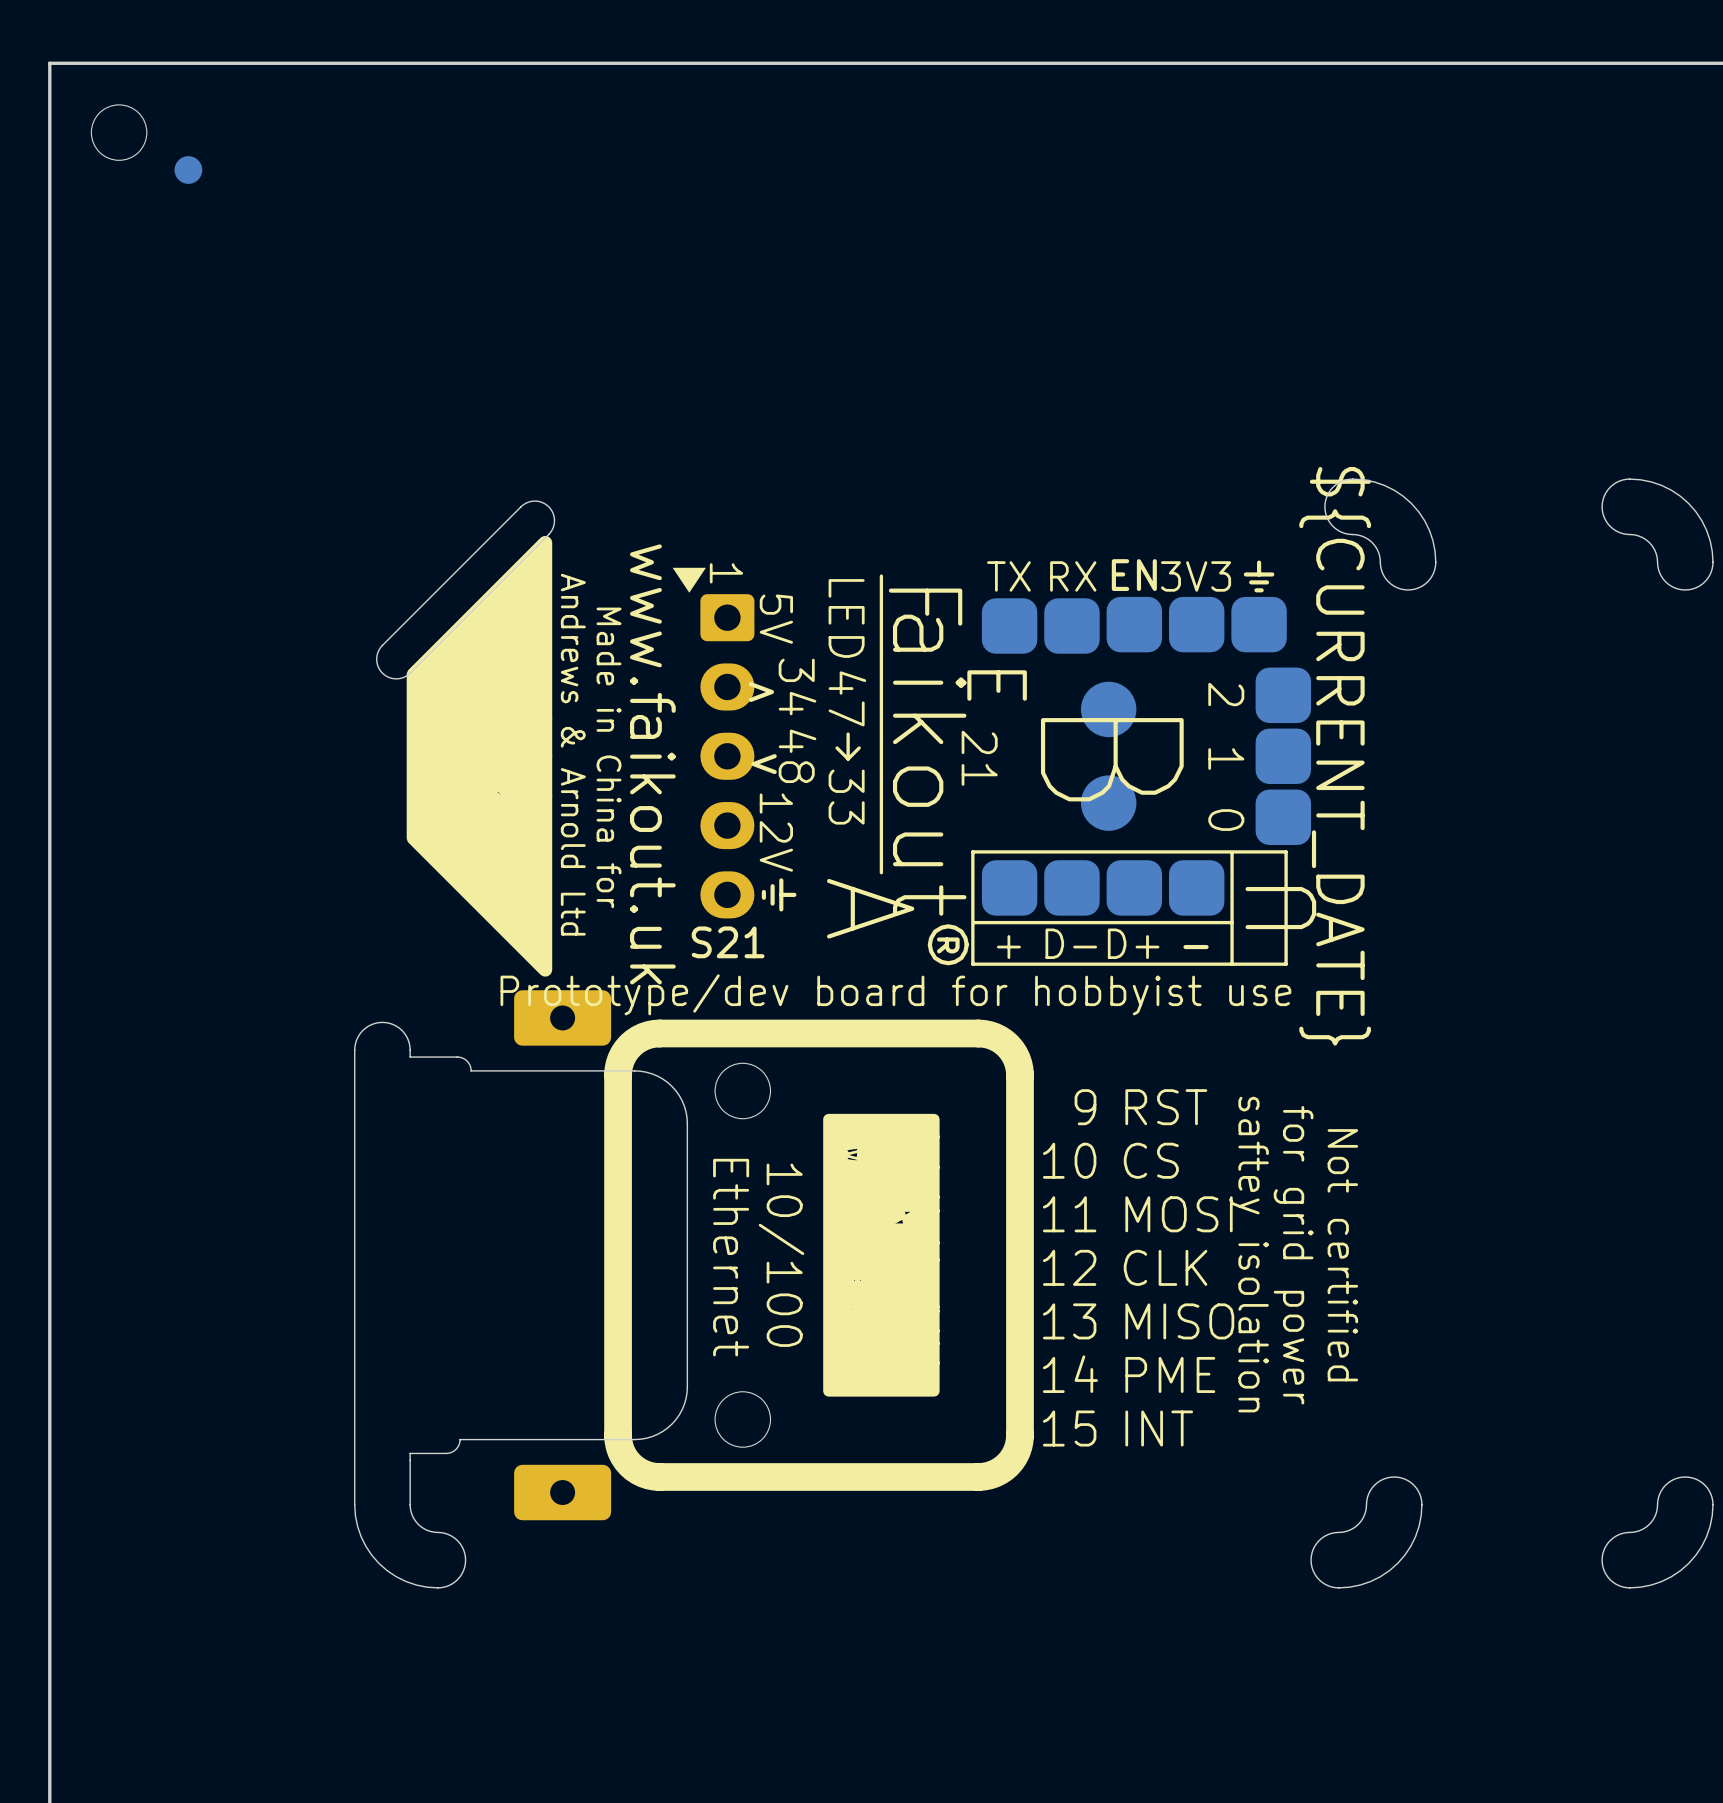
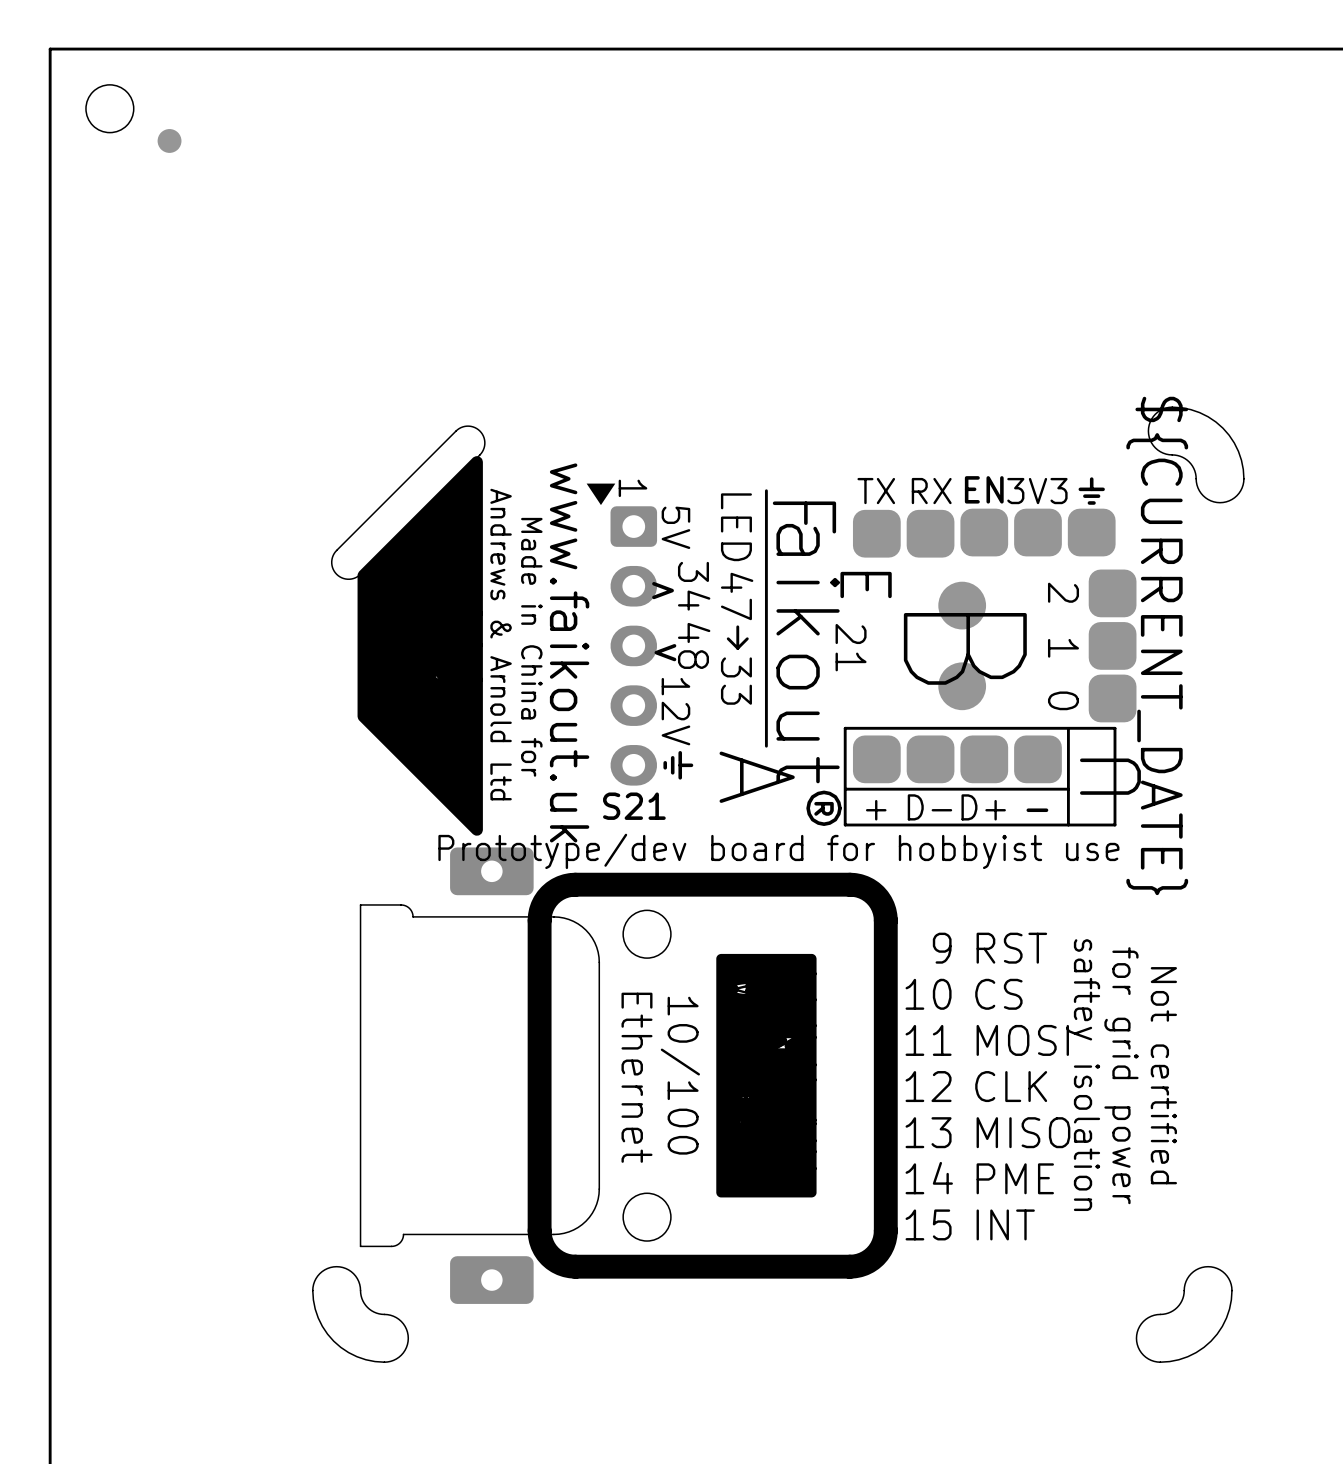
part footprint: [409, 990, 771, 1521] -> [359, 847, 671, 1304]
board edge: (410, 1050) (408, 1039) (402, 1030) (393, 1024) (382, 1022) (365, 1028) (358, 1036) (354, 1046) (354, 1504) -> none
board edge: none -> (360, 904) (360, 1246)
board edge: (410, 1460) (410, 1504) -> (312, 1290) (314, 1281) (319, 1273) (327, 1268) (336, 1266) (345, 1268) (353, 1273) (358, 1281) (360, 1290)

